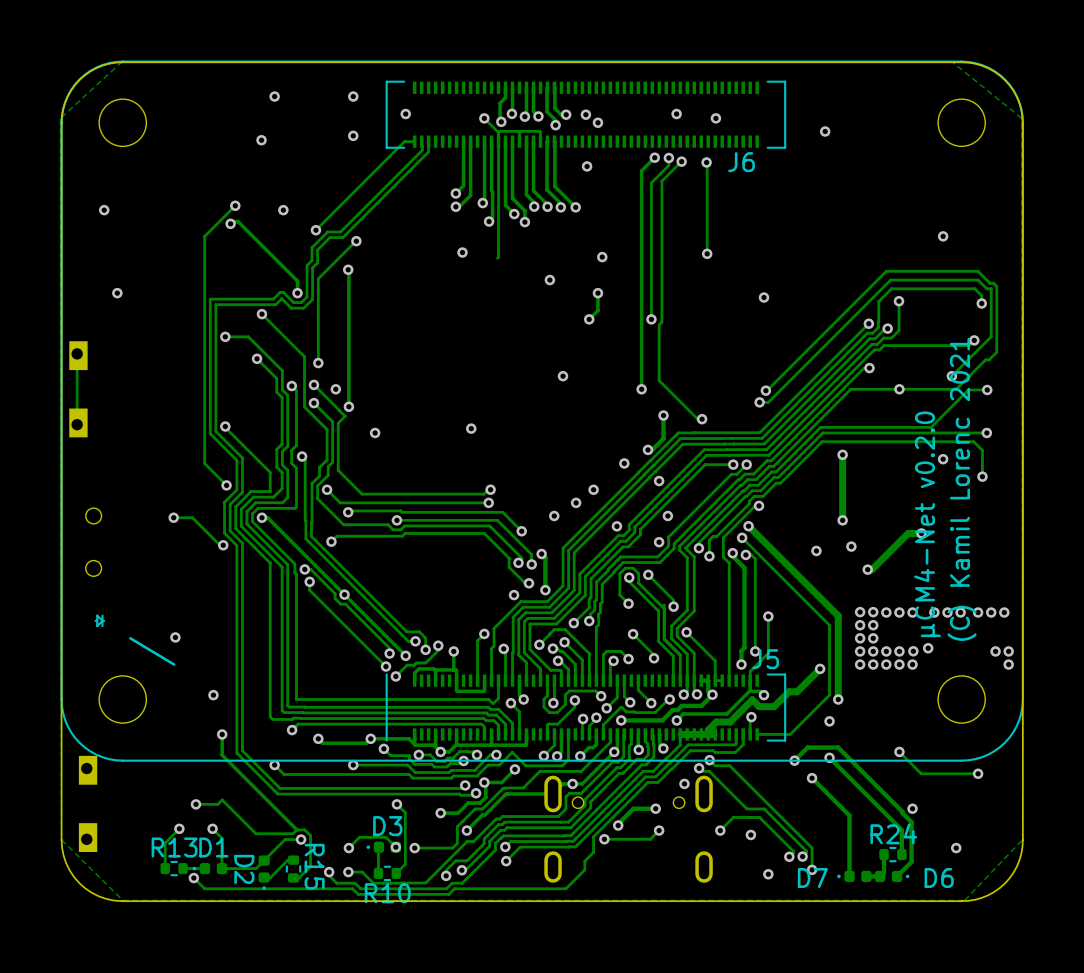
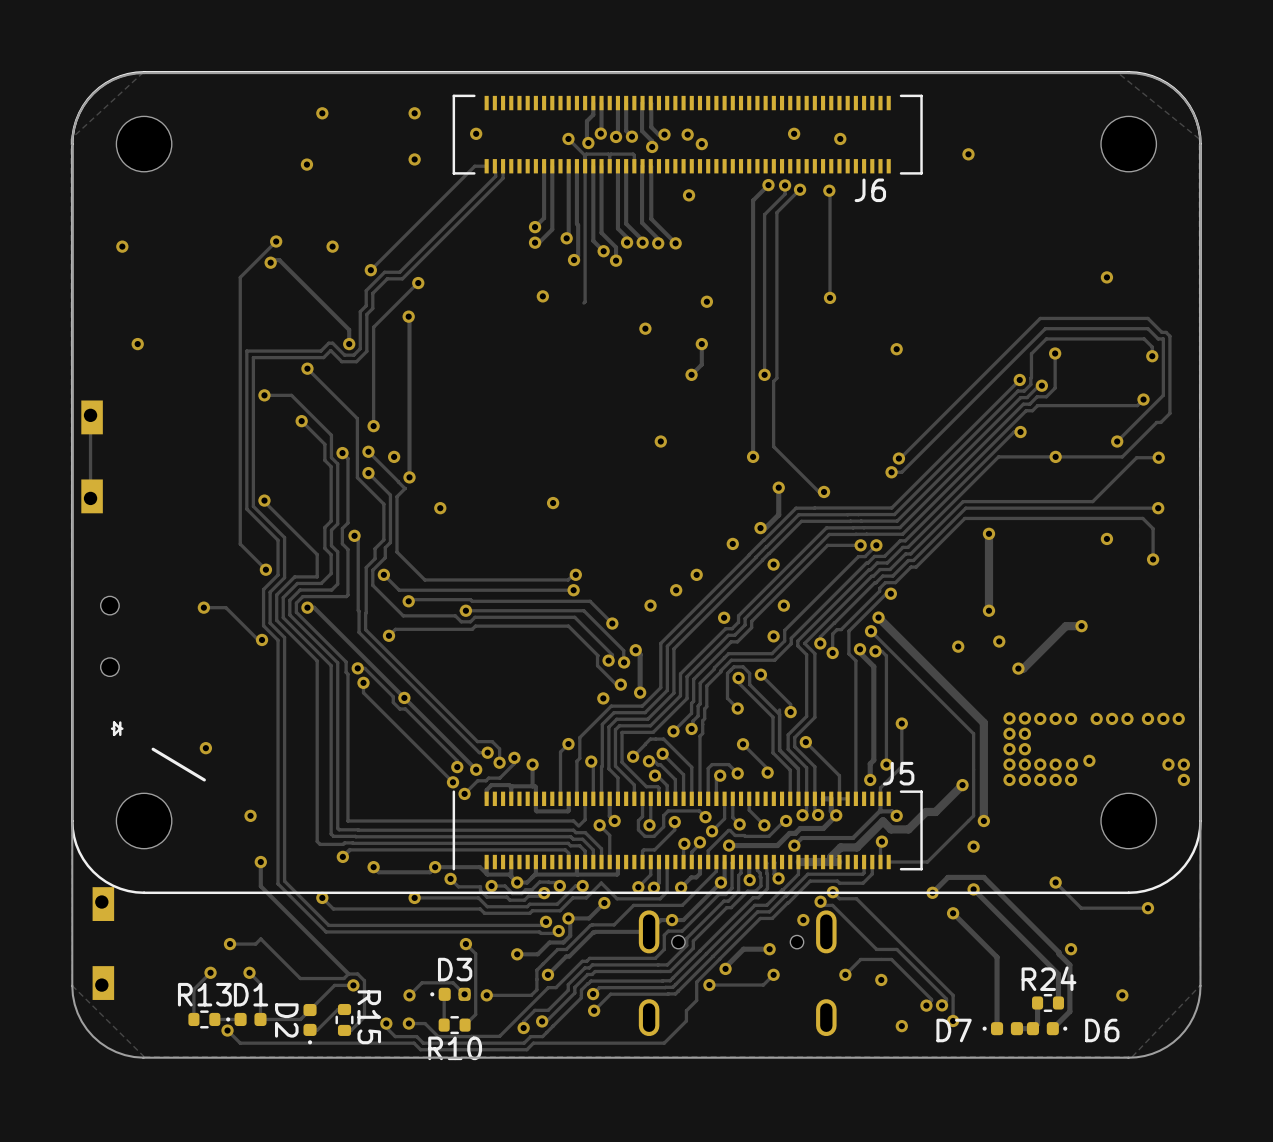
text: (C) Kamil Lorenc 2021 (962, 489) -> none
text: µCM4-Net v0.2.0 (927, 524) -> none

